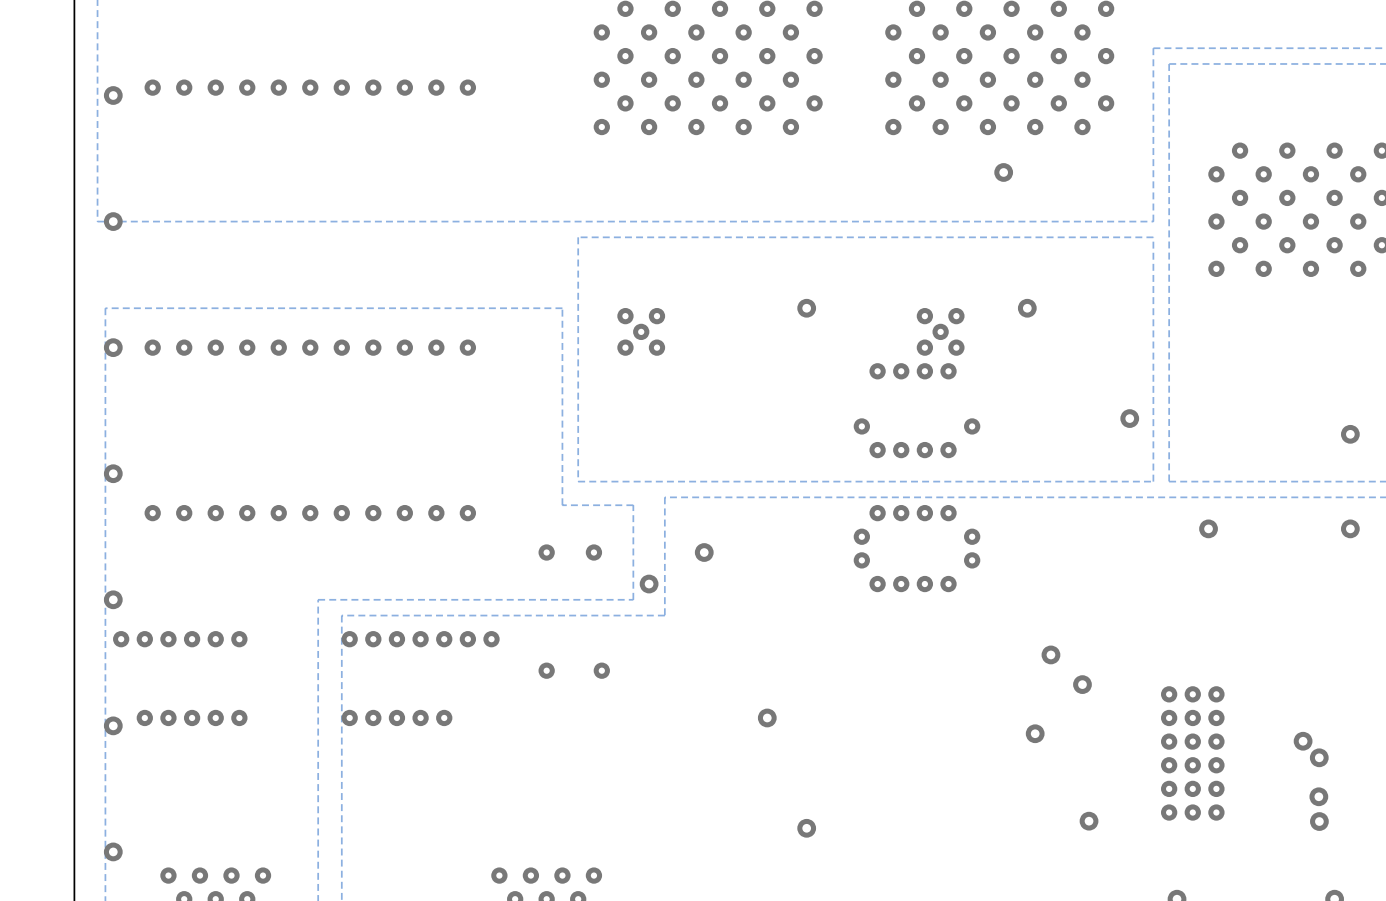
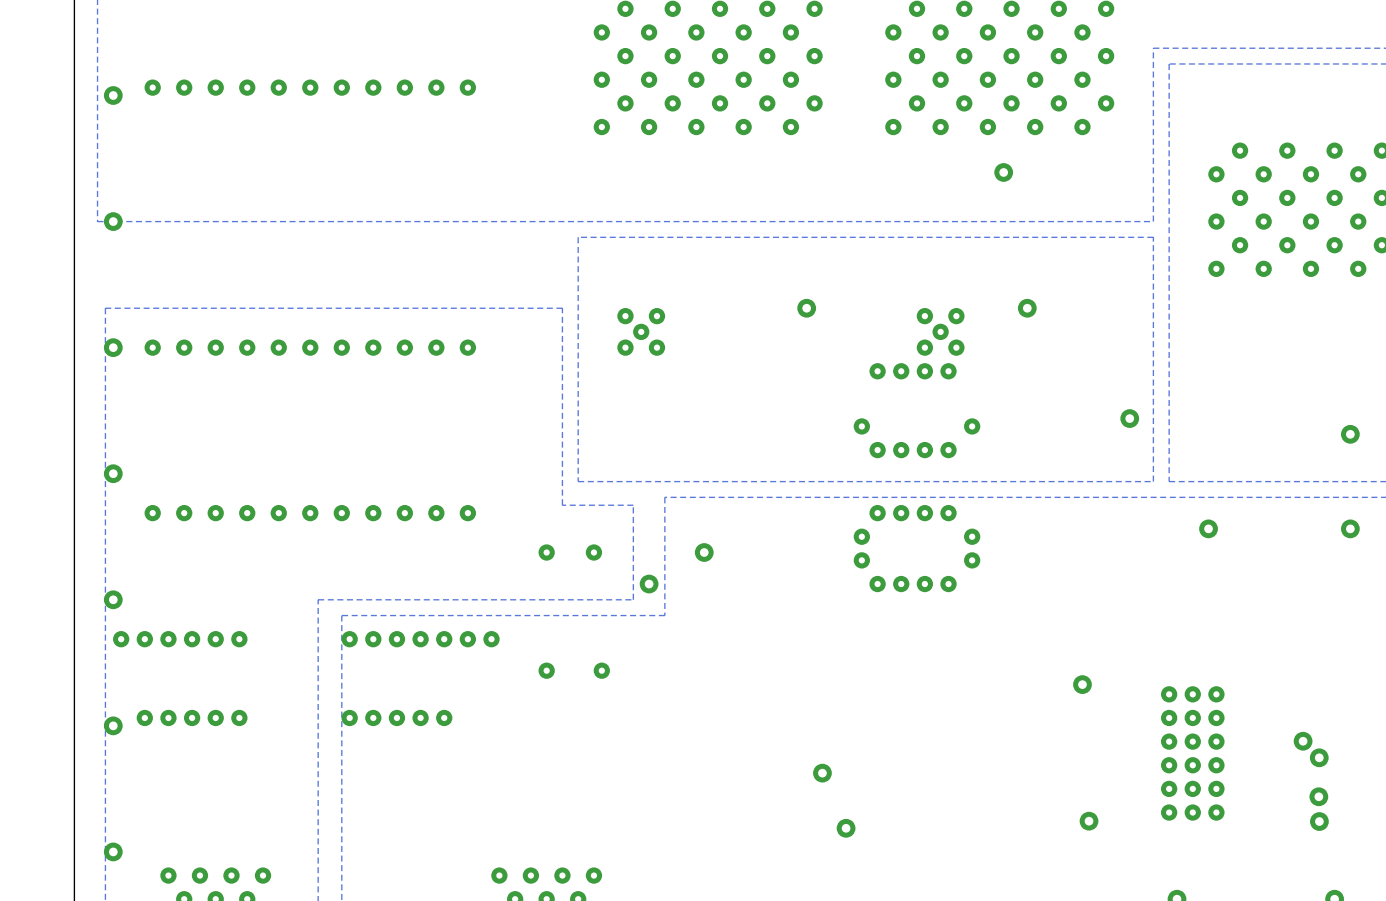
via: (1050, 654) -> none
via: (767, 717) -> none
via: (1035, 733) -> none
via: none -> (822, 773)
via: (806, 828) -> none
via: none -> (846, 828)

